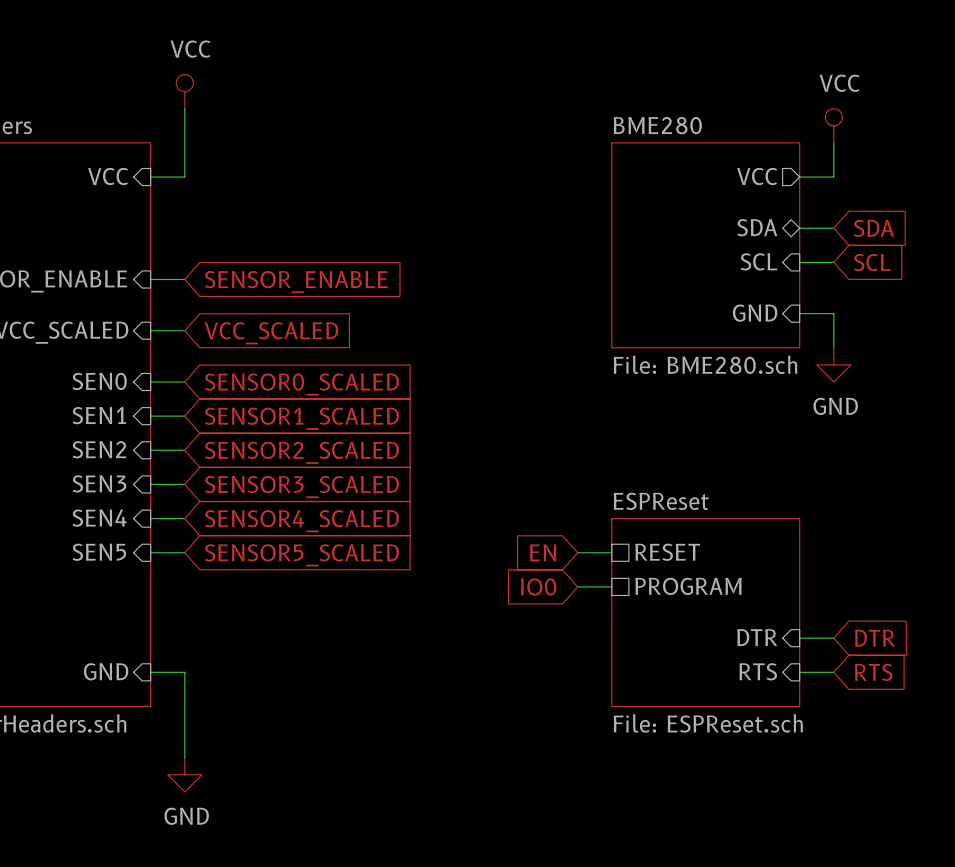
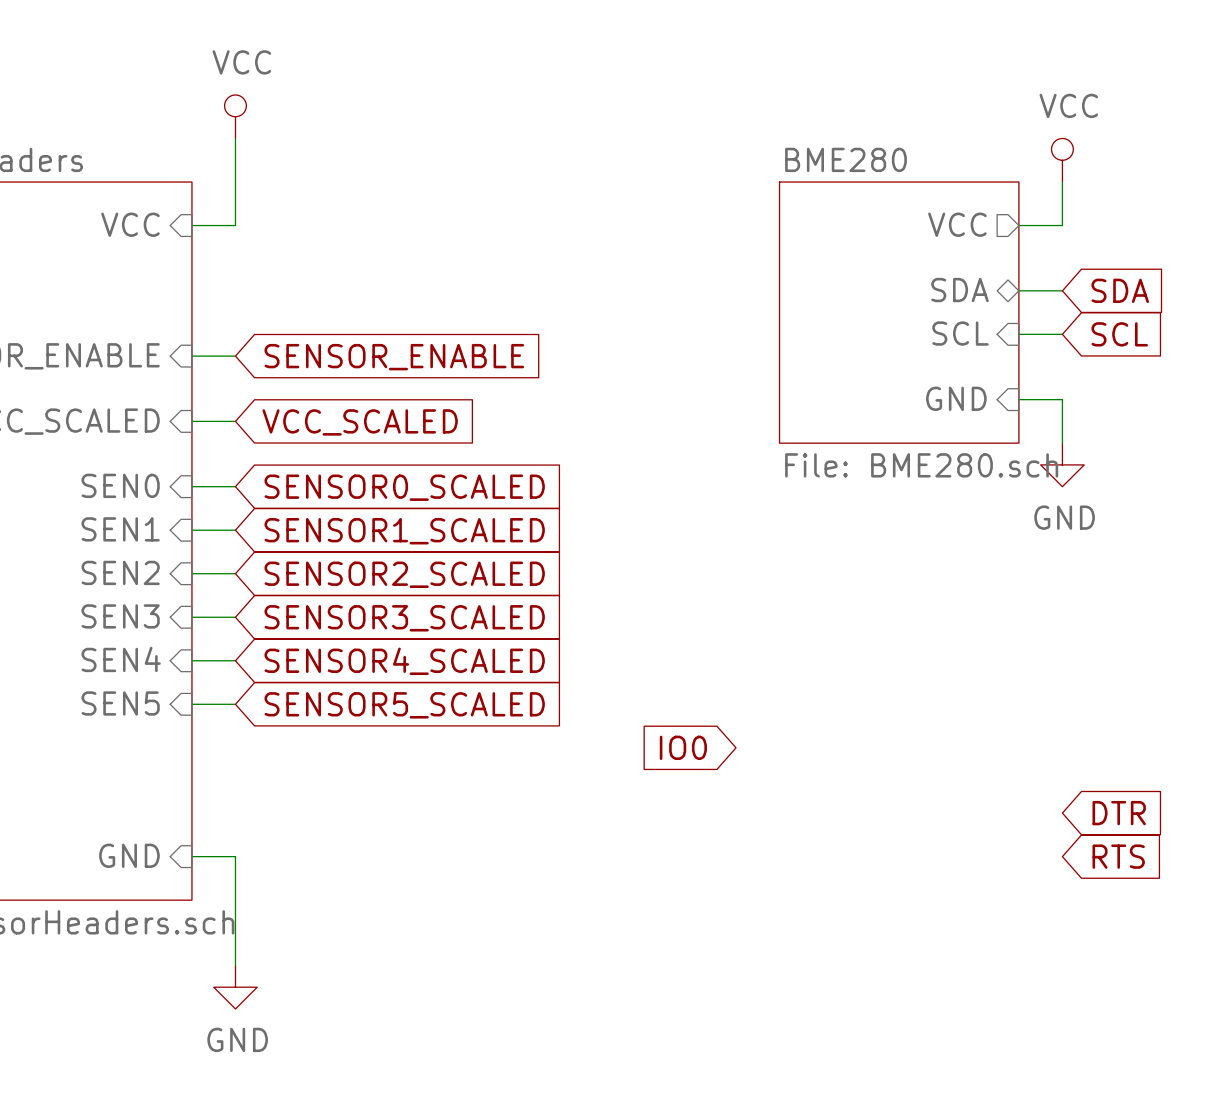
global label: EN (543, 552) -> none
wire: (577, 552) (611, 552) -> none
sheet pin: RESET (667, 552) -> none
wire: (577, 586) (611, 586) -> none
sheet pin: PROGRAM (688, 586) -> none
sheet ESPReset: File: ESPReset.sch (705, 612) -> none
sheet pin: DTR (757, 637) -> none
wire: (799, 638) (833, 638) -> none
sheet pin: RTS (758, 671) -> none
wire: (799, 672) (833, 672) -> none

